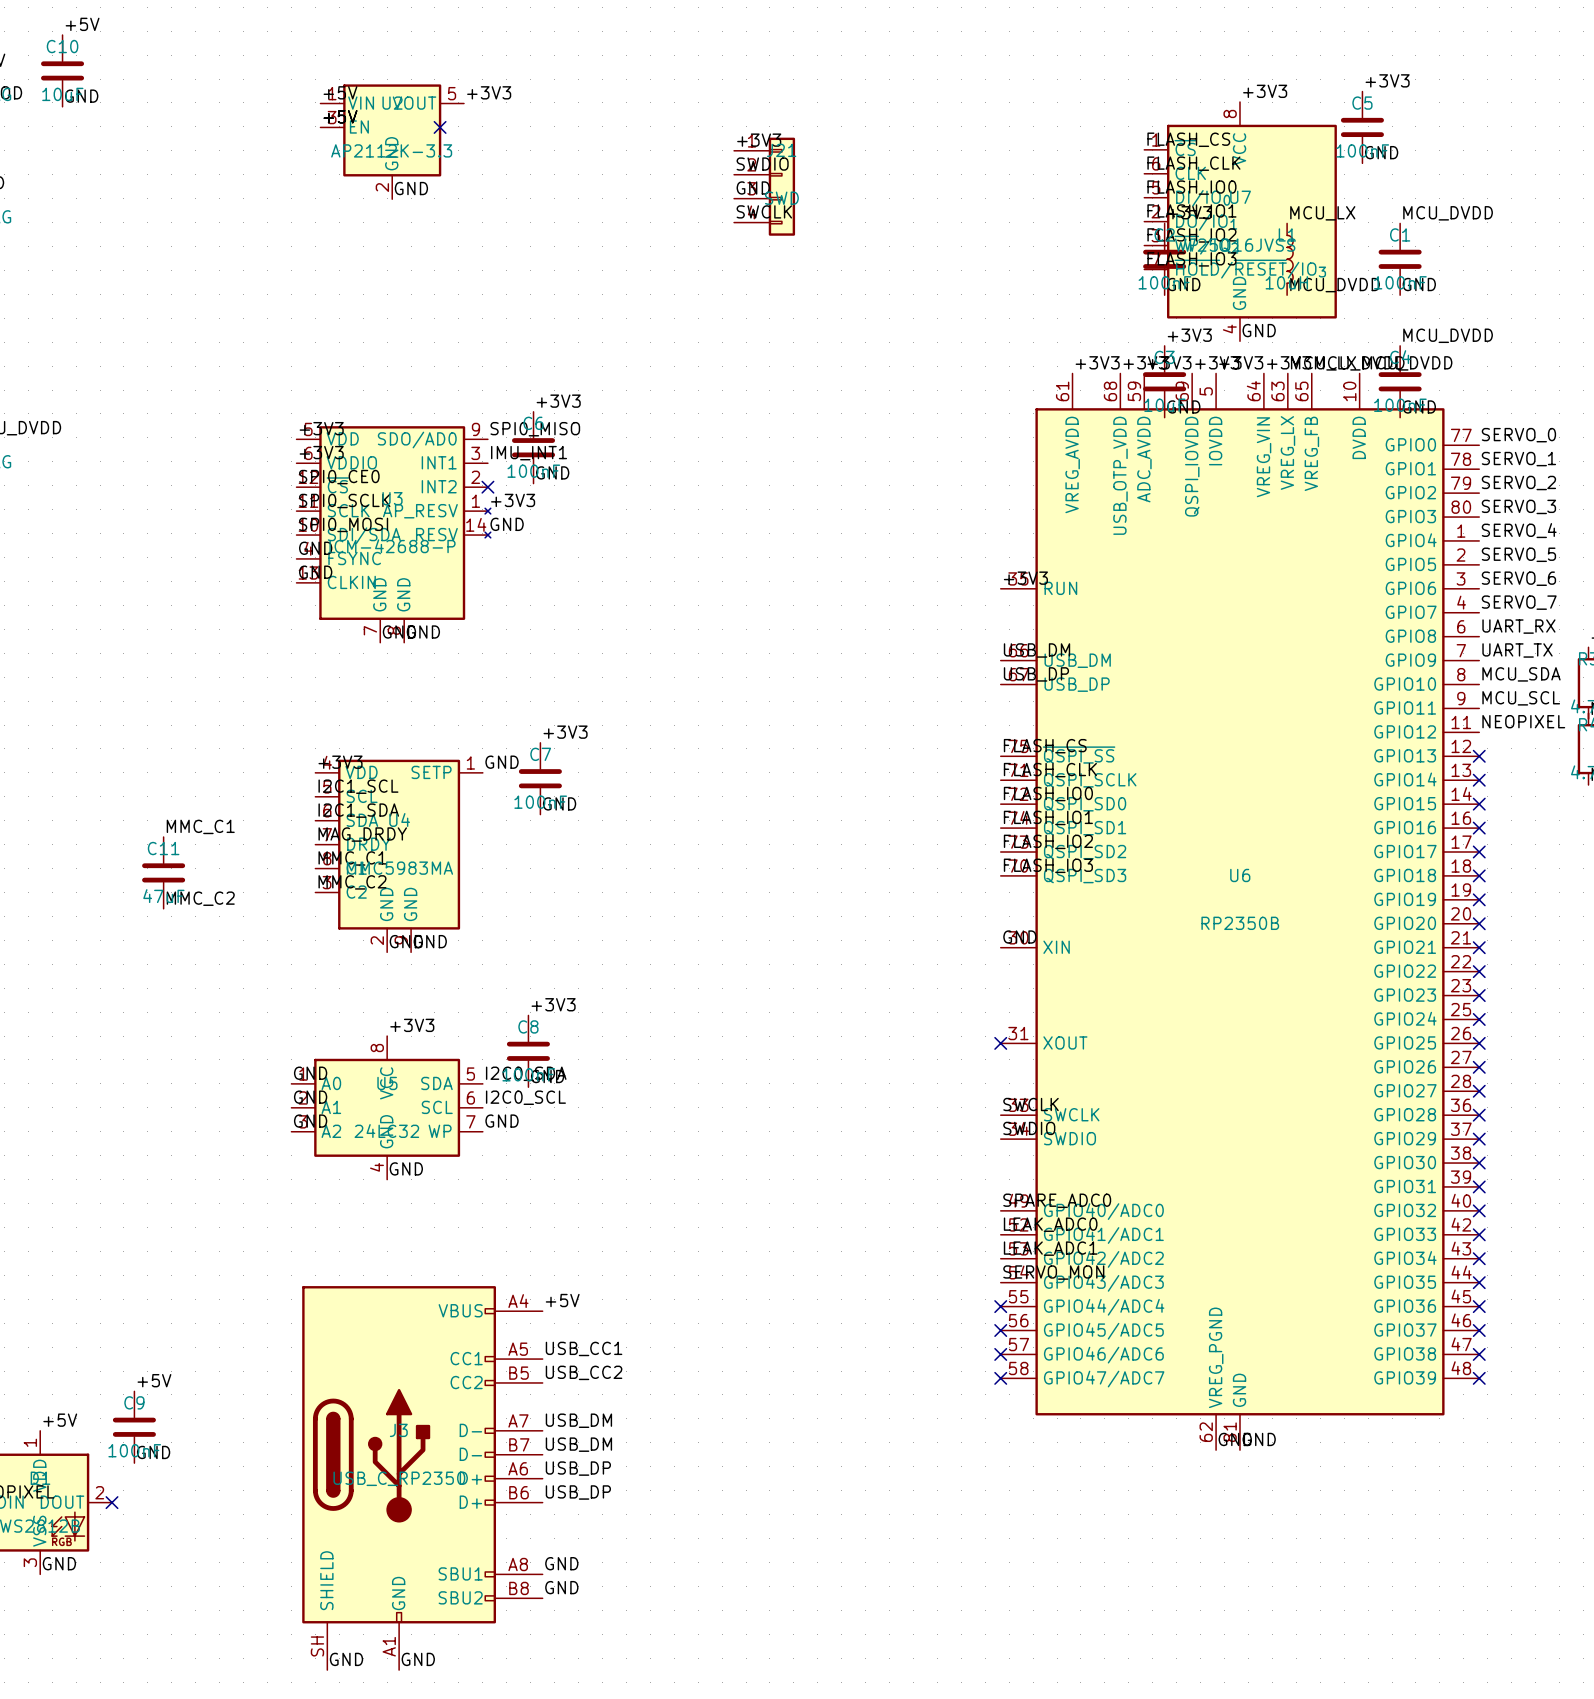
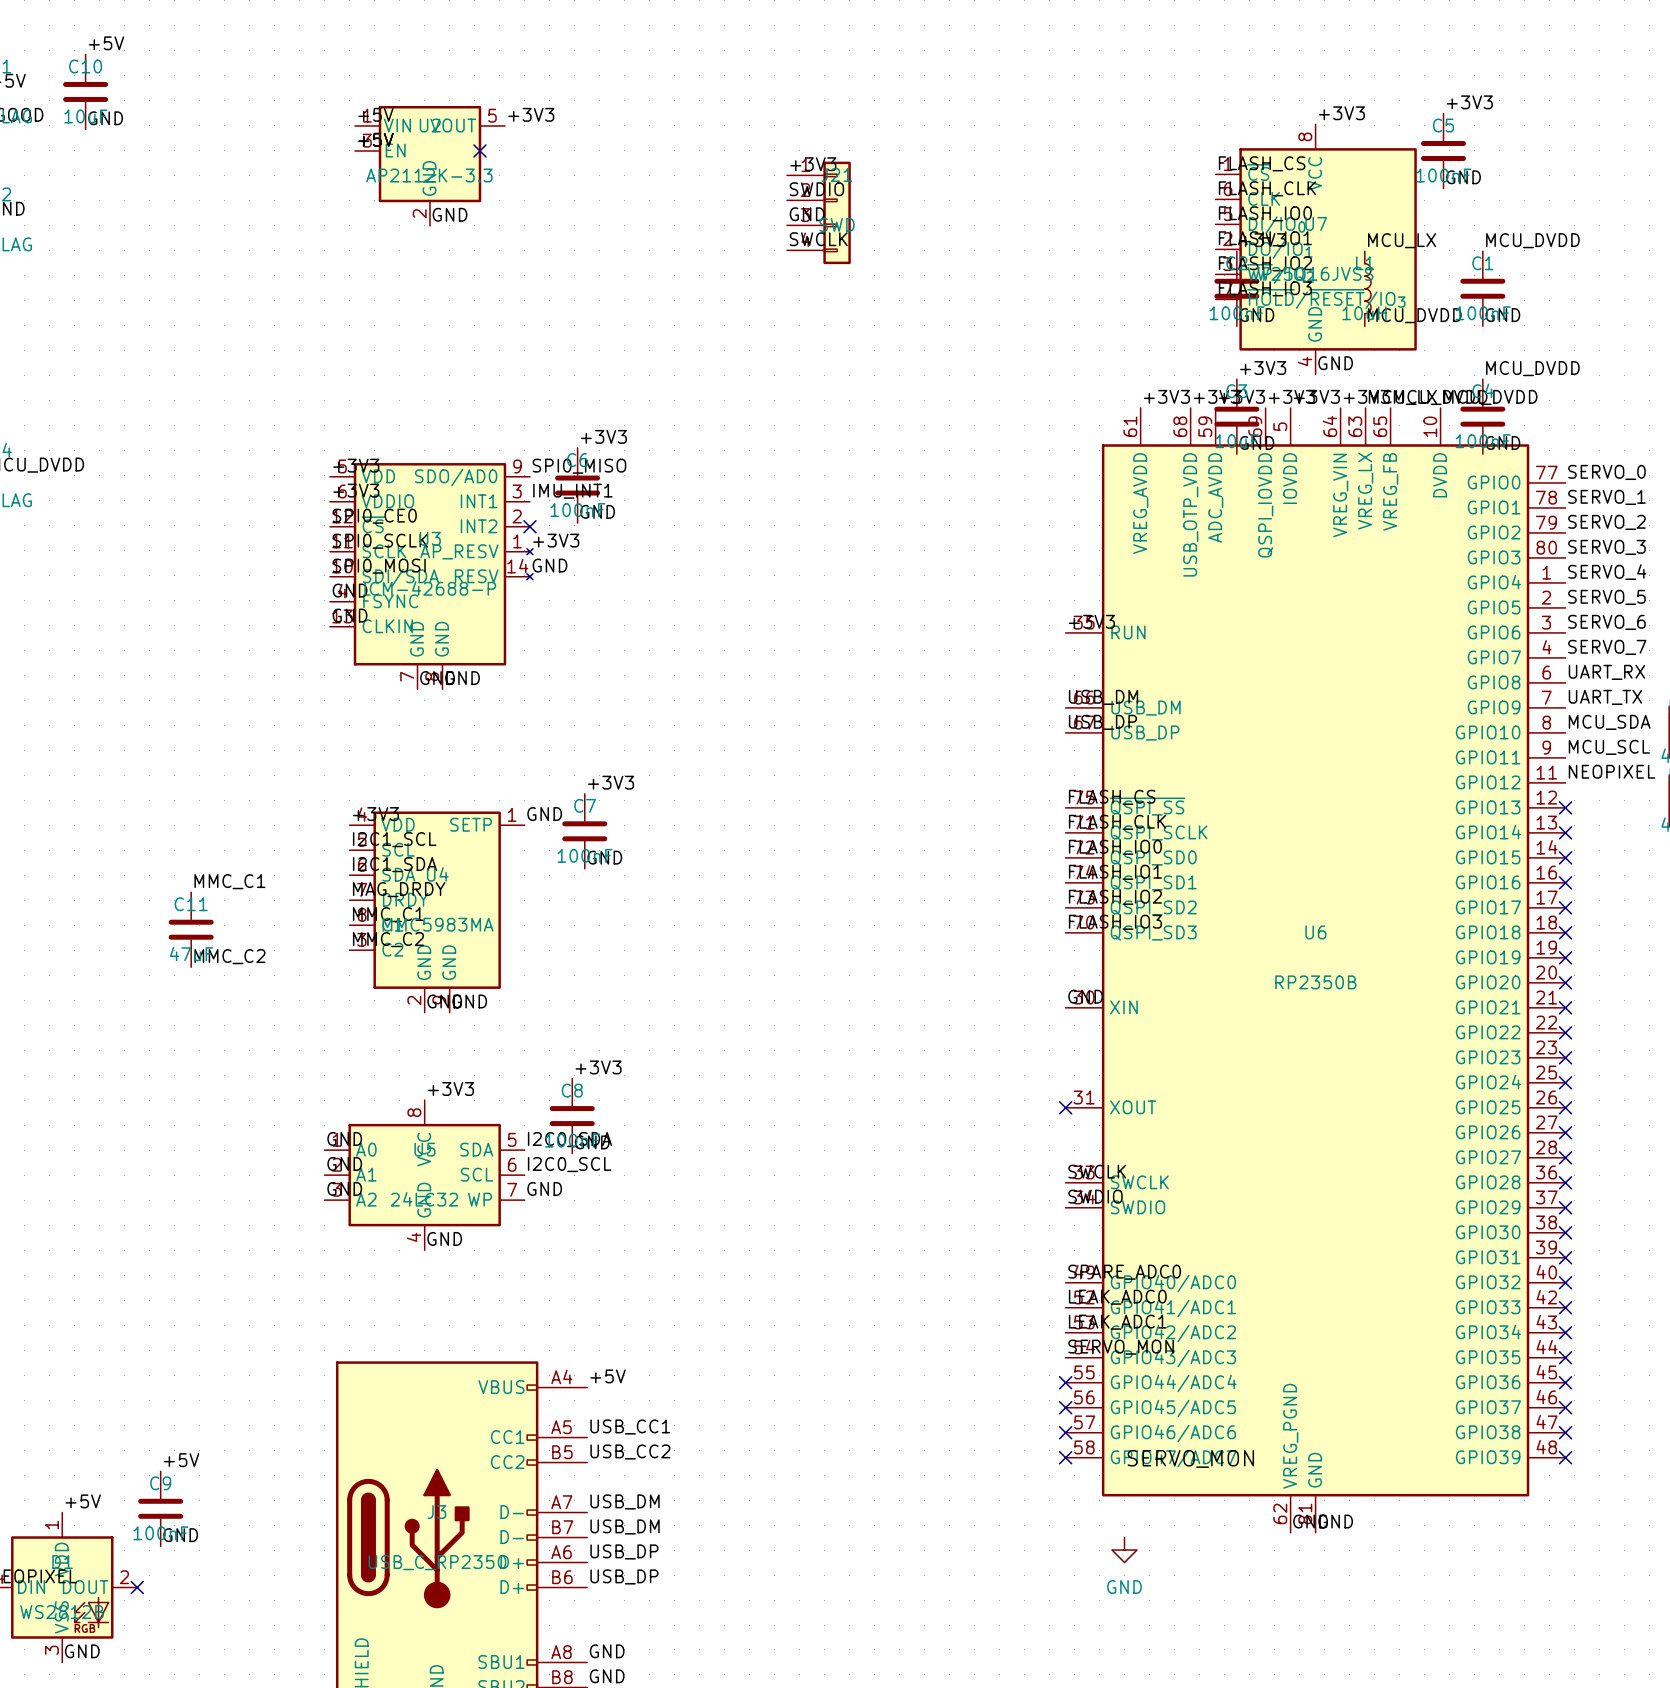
label: none -> SERVO_MON (1190, 1458)
power symbol: none -> GND (1124, 1550)

